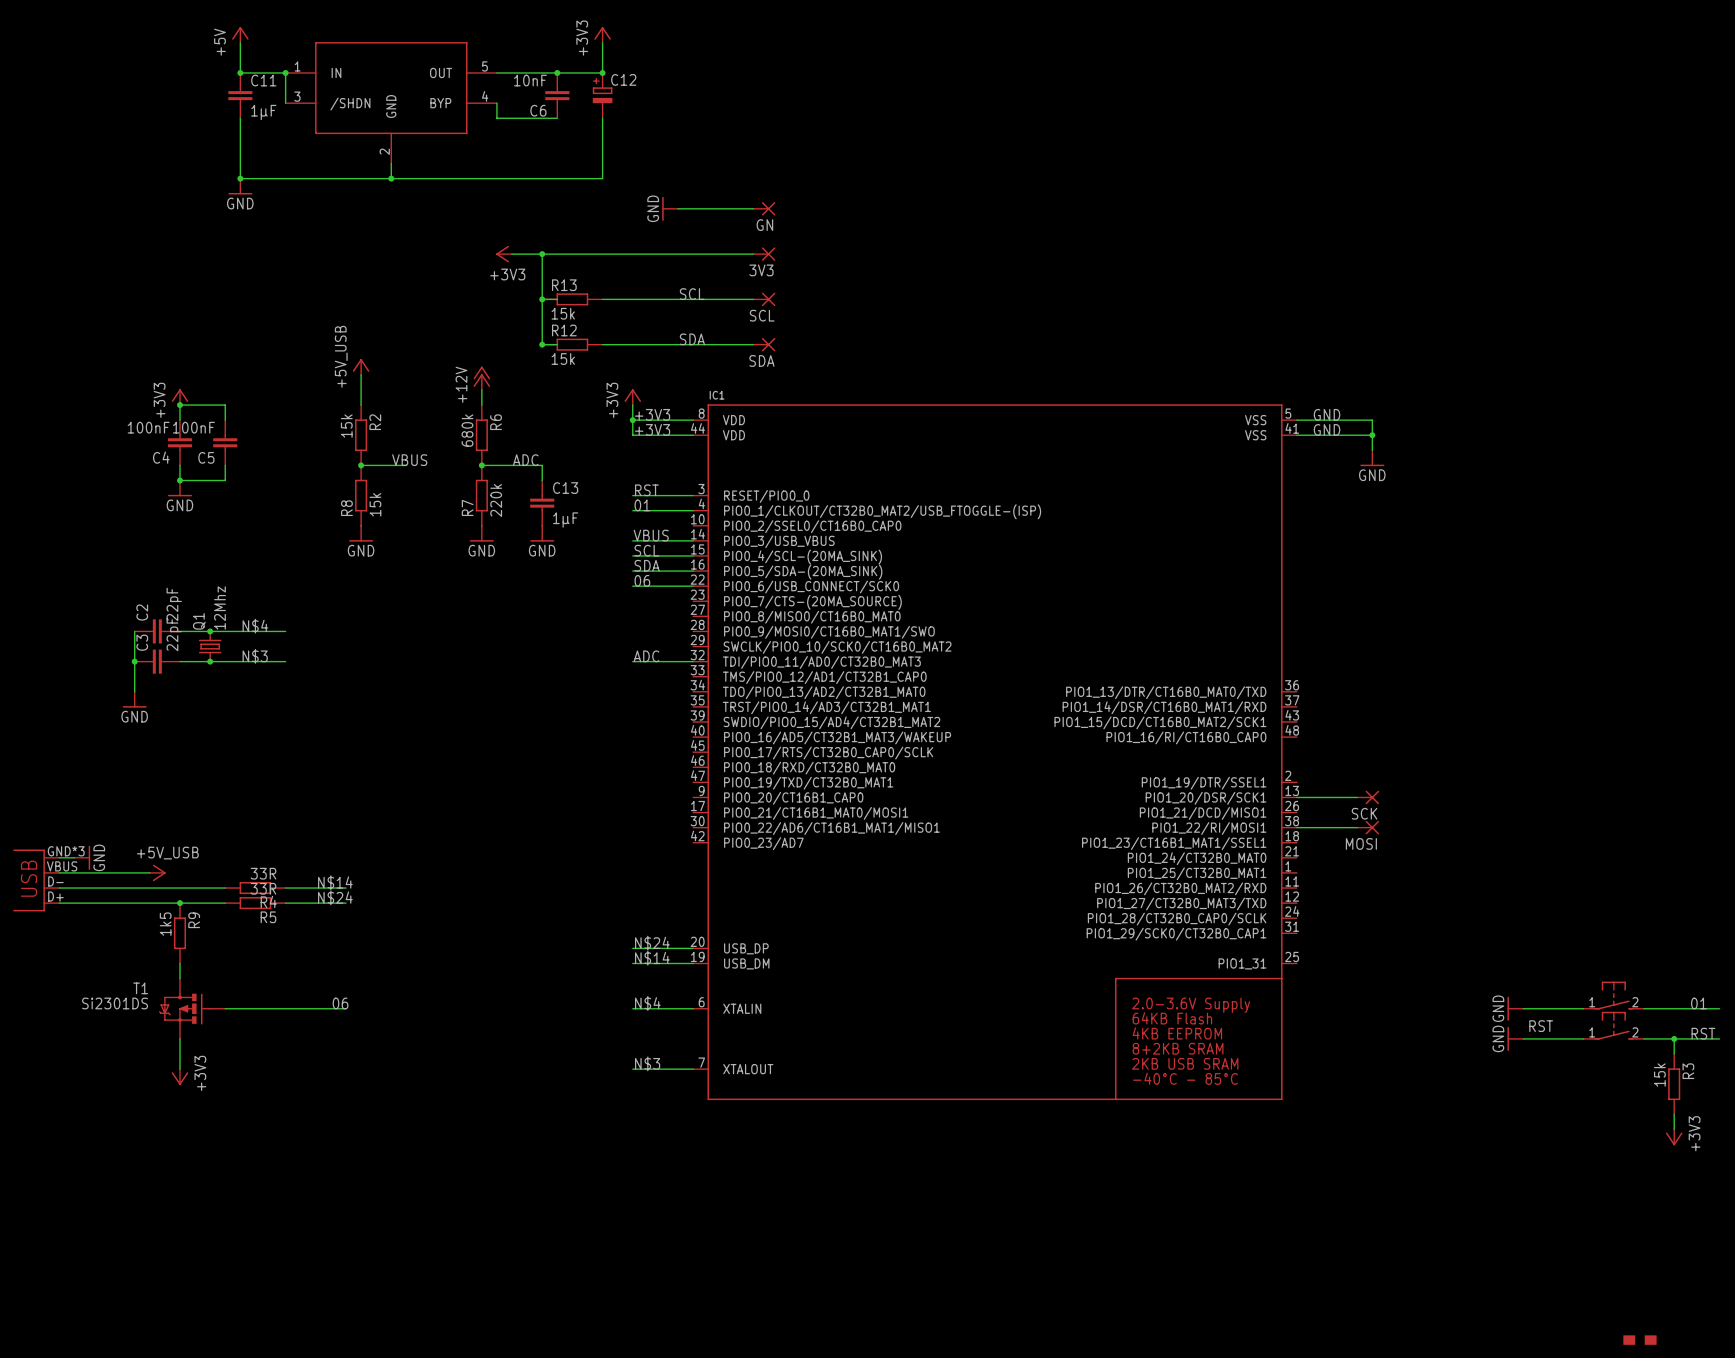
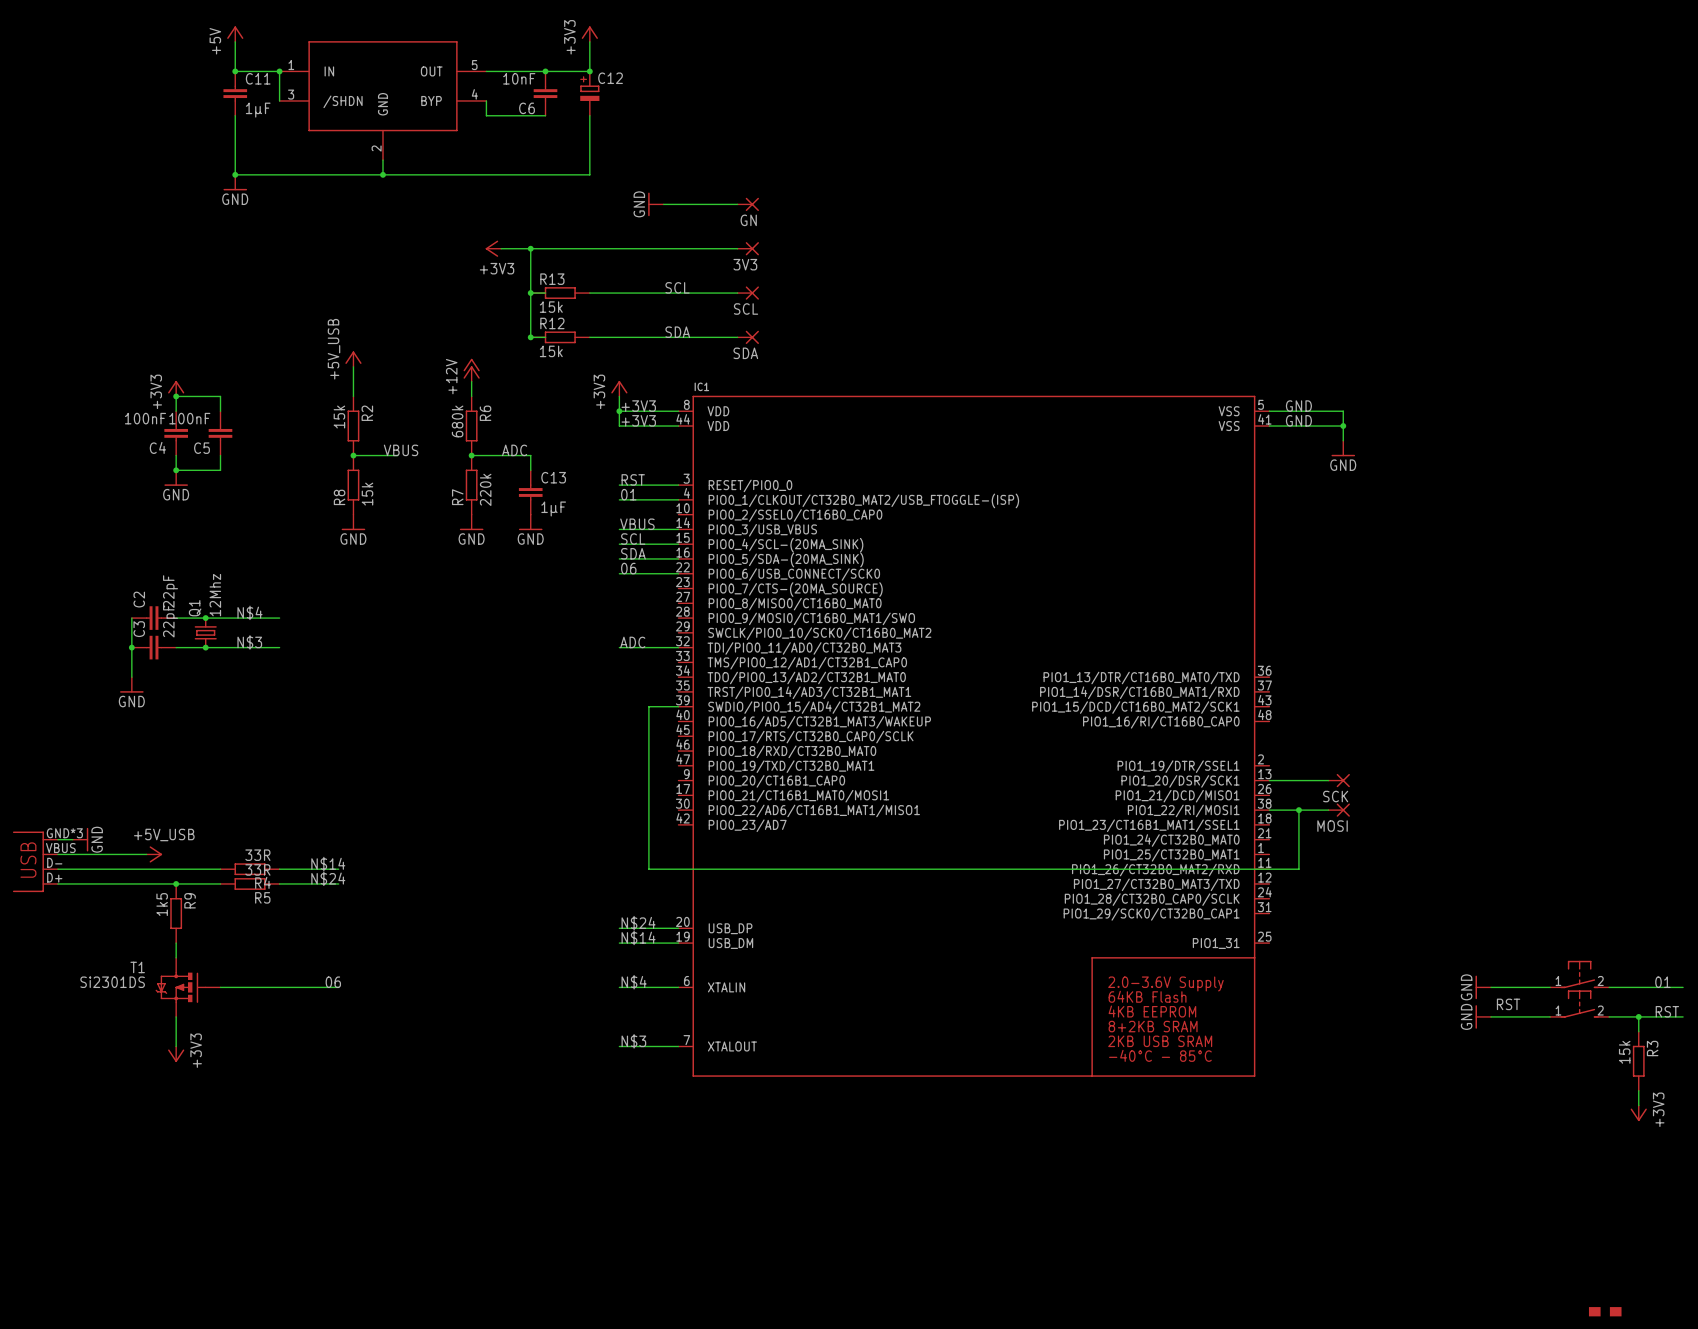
wire: none -> (678, 706) (648, 706) (648, 869) (1298, 869) (1298, 810)
junction: none -> (1298, 810)

